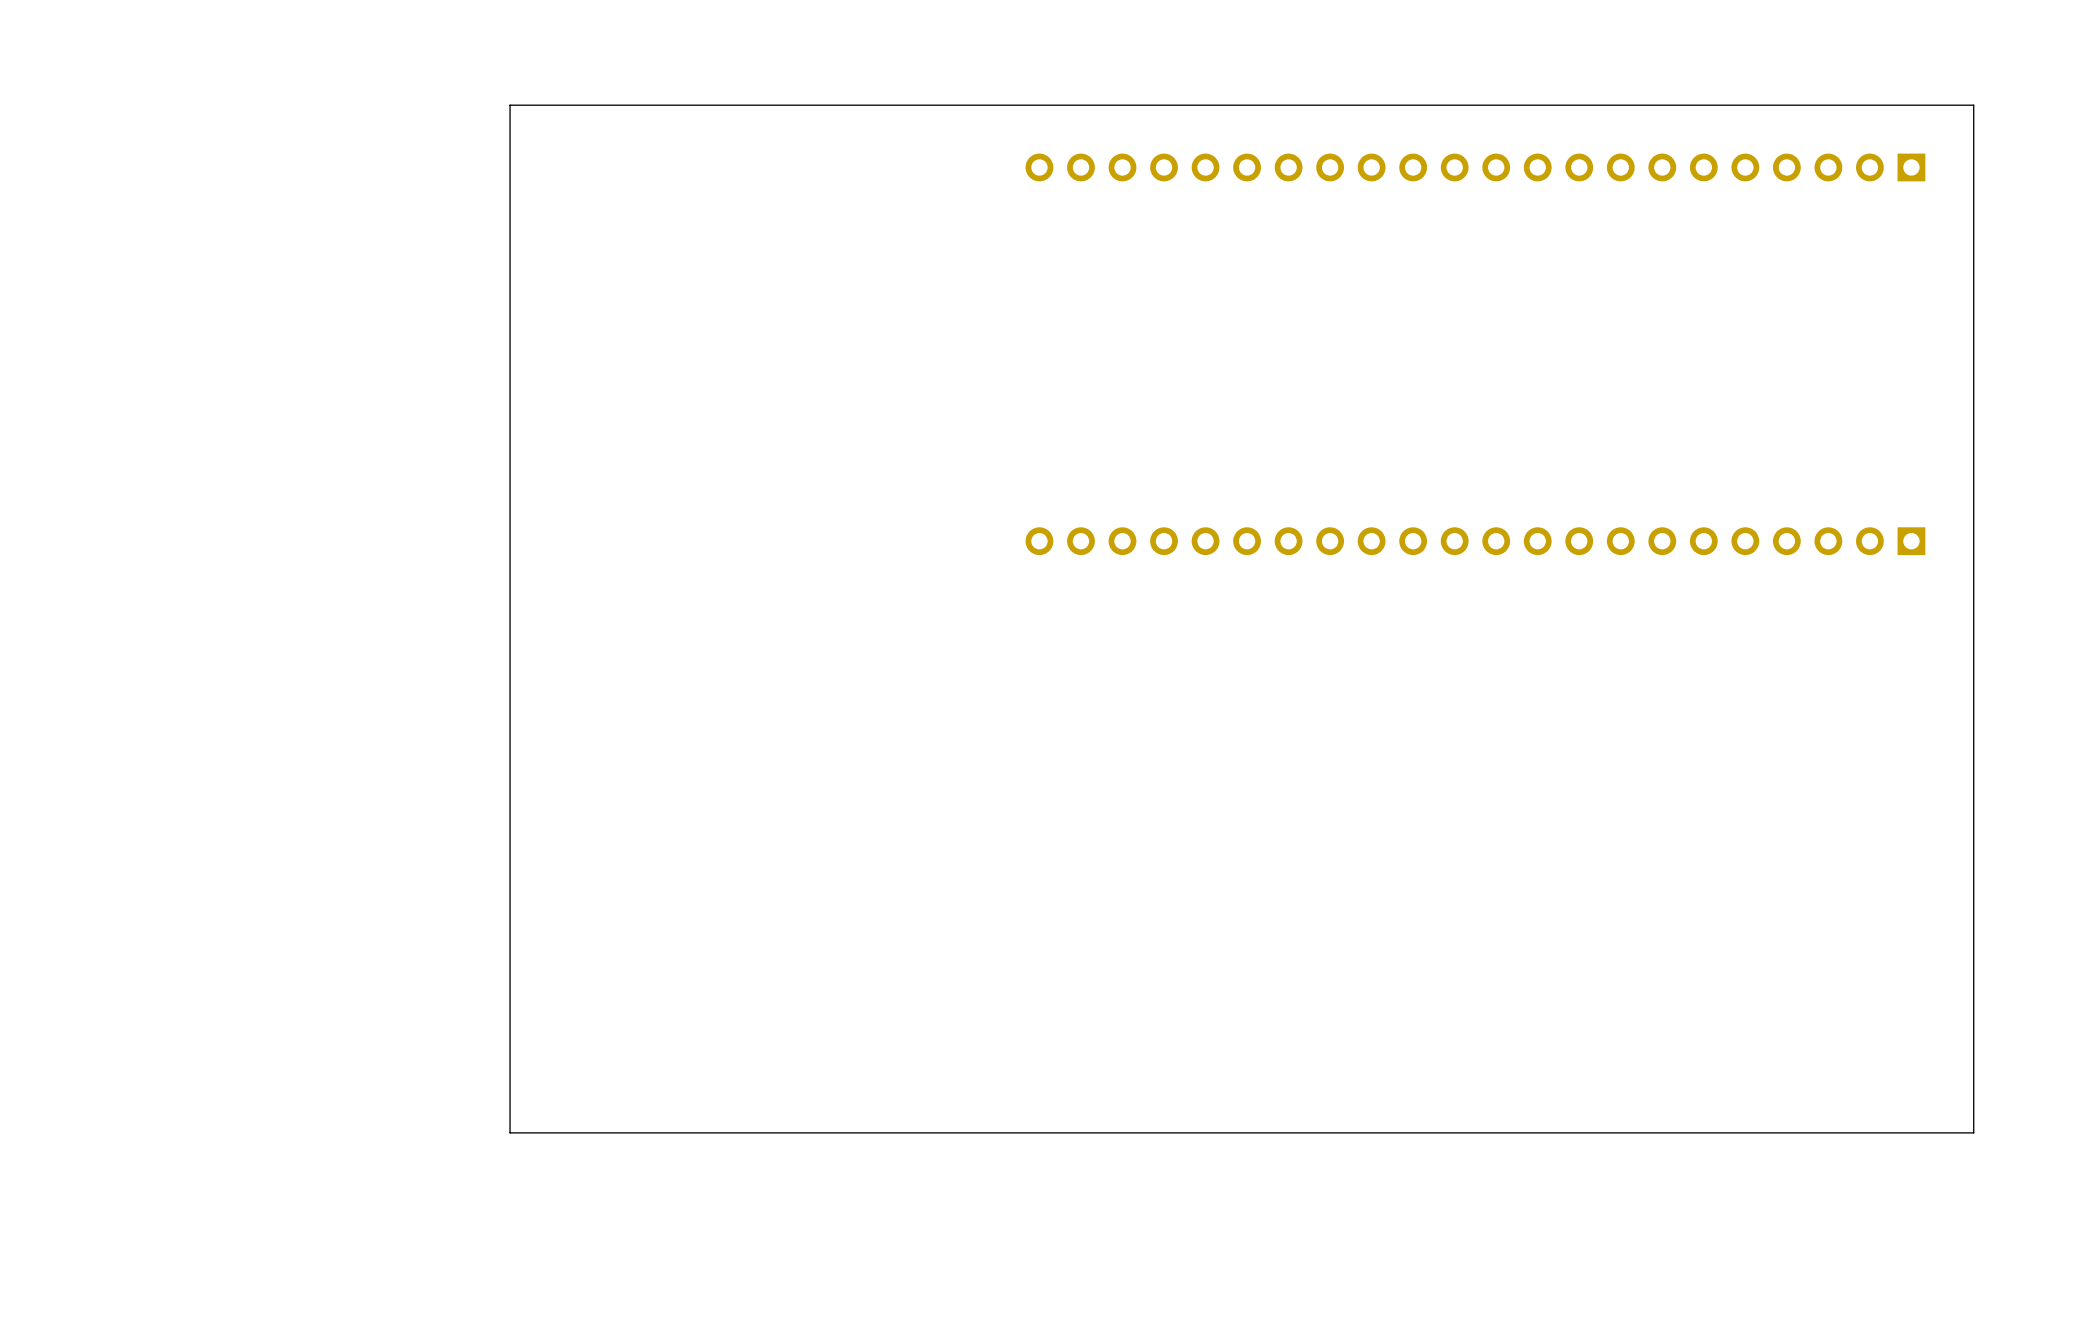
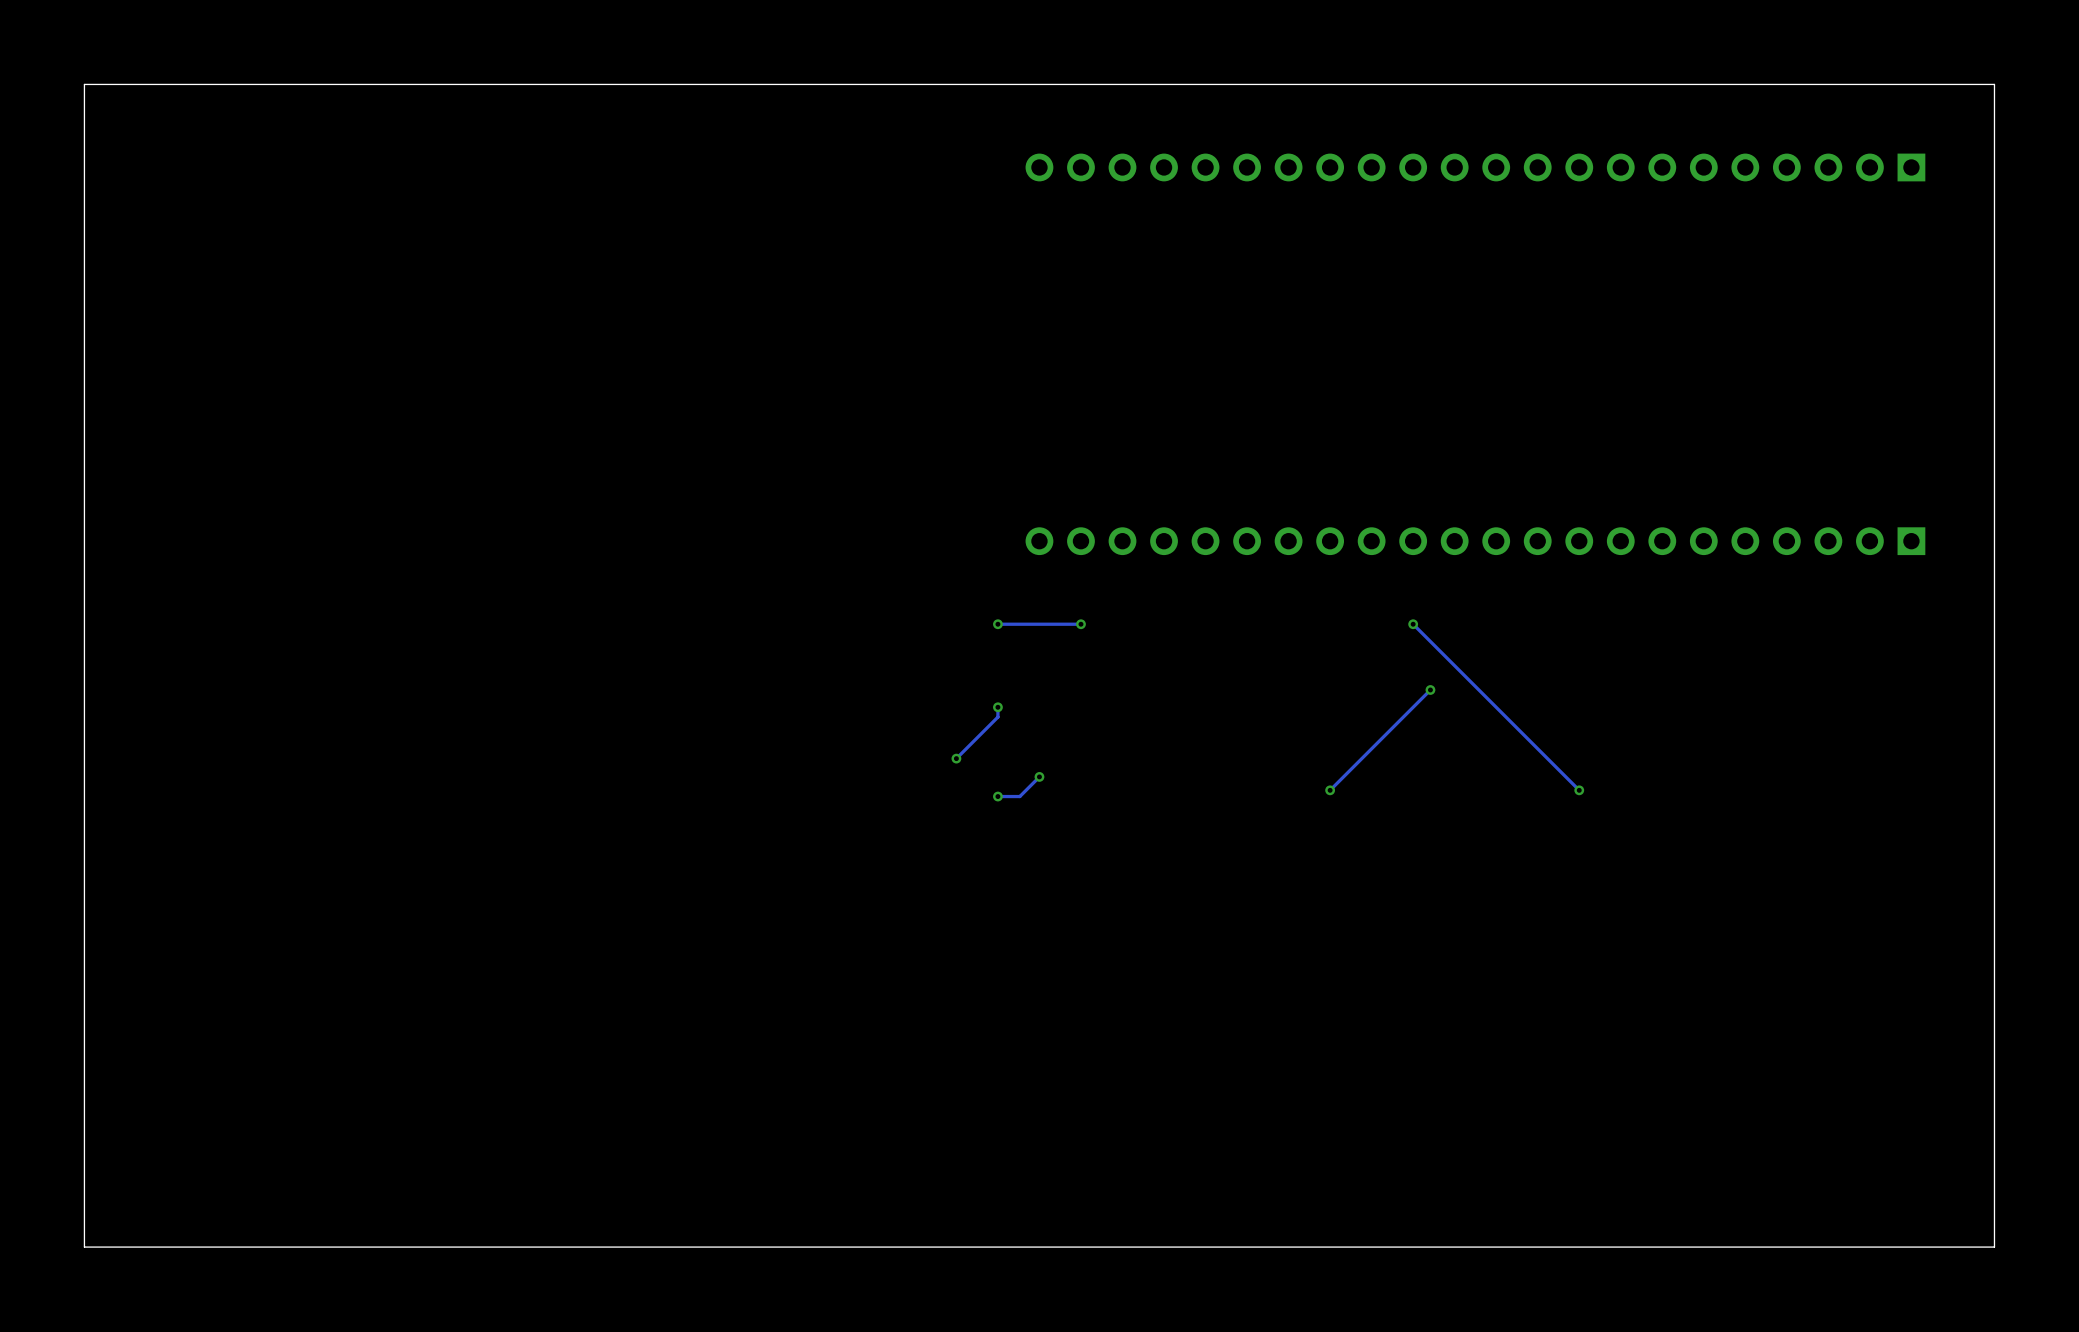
board edge: (1973, 105) (510, 105) (510, 1132) (1973, 1132) (1973, 105) -> (1994, 84) (1994, 1247) (84, 1247) (84, 84) (1994, 84)
via: none -> (997, 624)
track: none -> (1080, 624) (997, 624)
via: none -> (1080, 624)
track: none -> (1413, 624) (1579, 790)
via: none -> (1413, 624)
track: none -> (1430, 689) (1330, 790)
via: none -> (1430, 689)
track: none -> (997, 707) (997, 717) (956, 758)
via: none -> (997, 707)
via: none -> (956, 758)
track: none -> (1039, 776) (1019, 796) (997, 796)
via: none -> (1039, 776)
via: none -> (1330, 790)
via: none -> (1579, 790)
via: none -> (997, 796)

